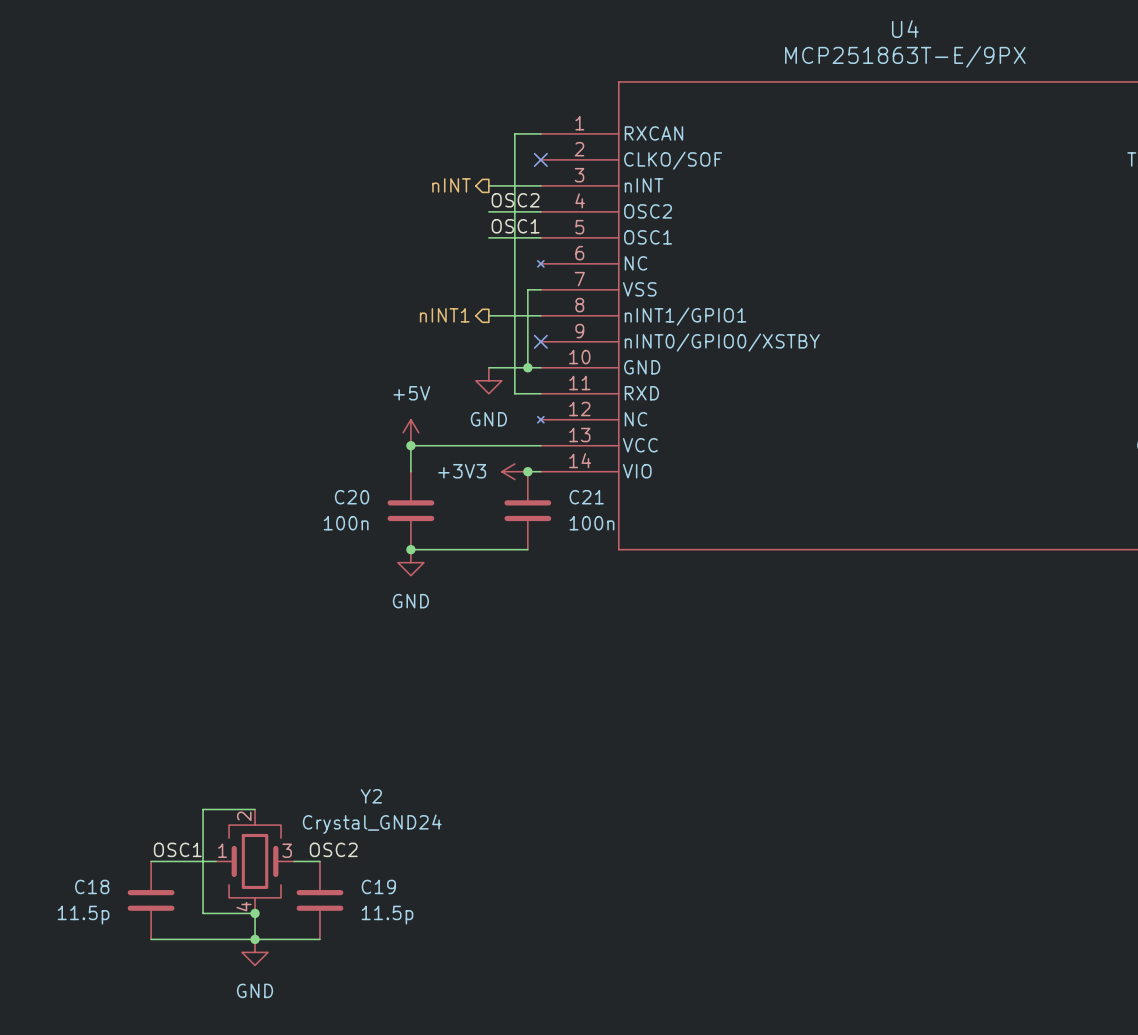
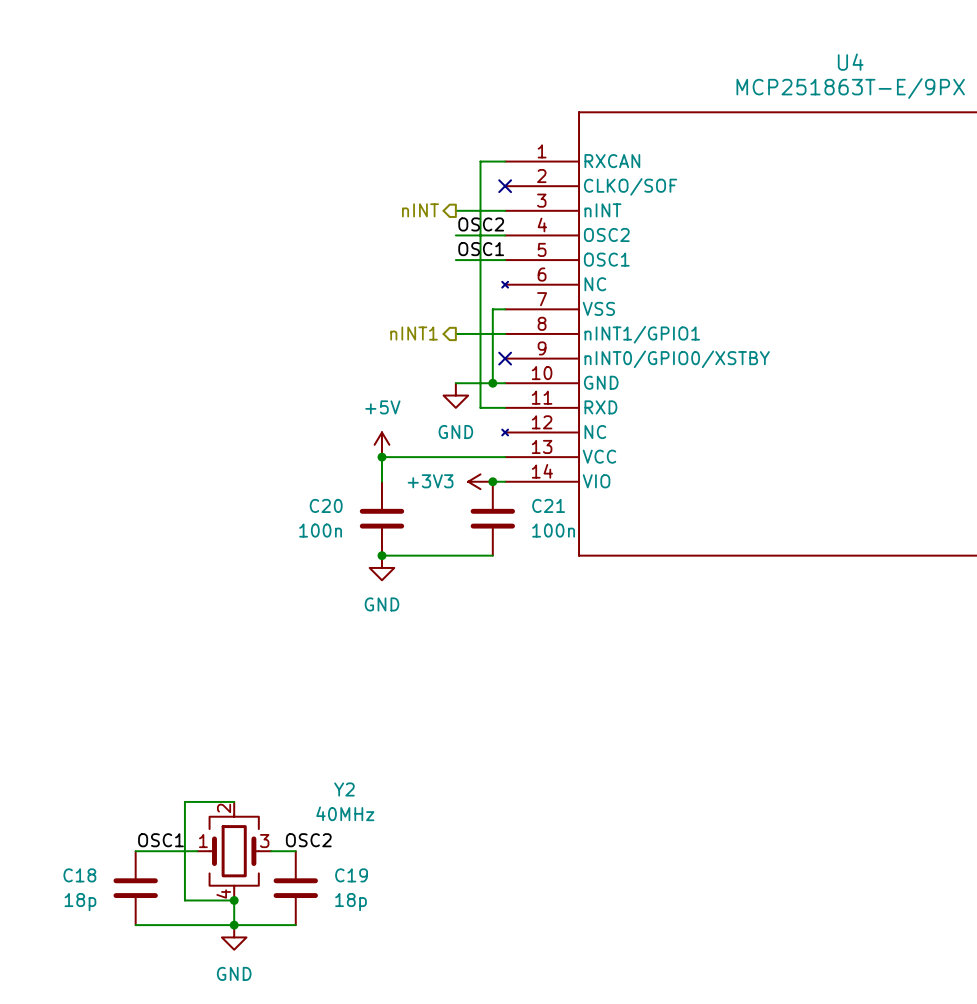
Y2 value: Crystal_GND24 (372, 824) -> 40MHz (345, 813)
C18 value: 11.5p (83, 915) -> 18p (80, 902)
C19 value: 11.5p (387, 915) -> 18p (350, 902)

